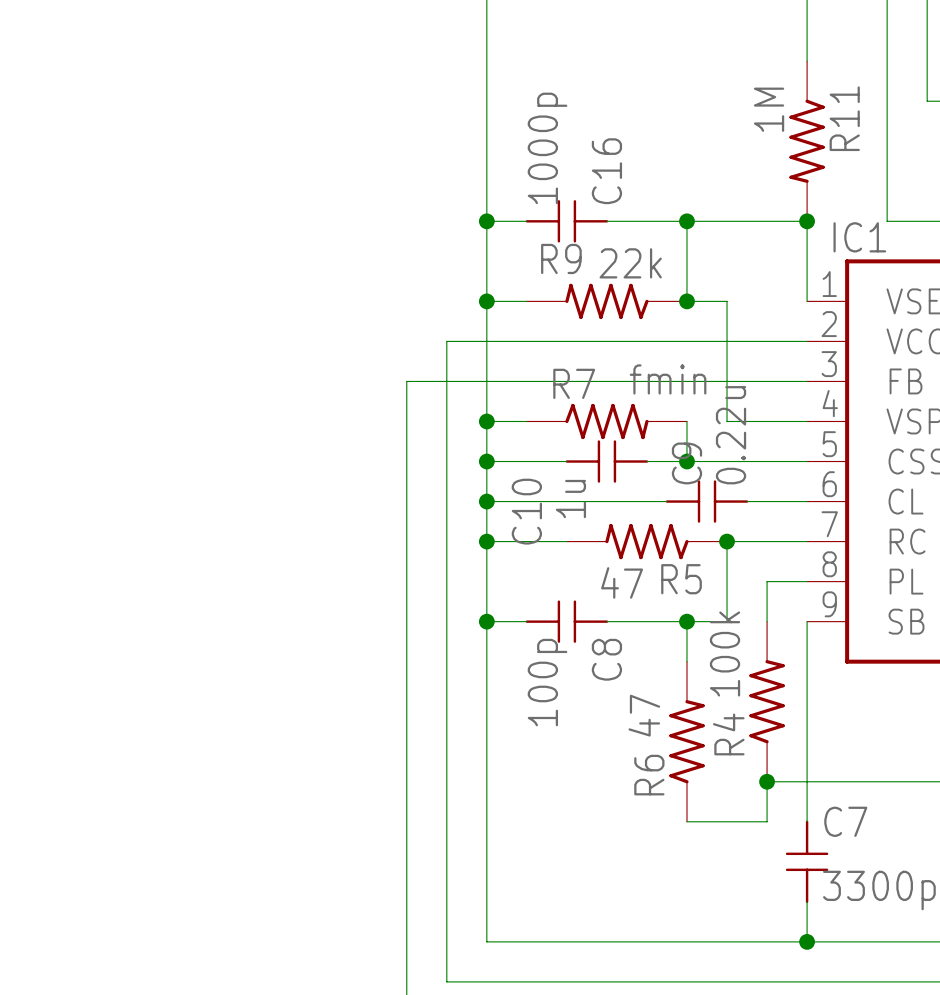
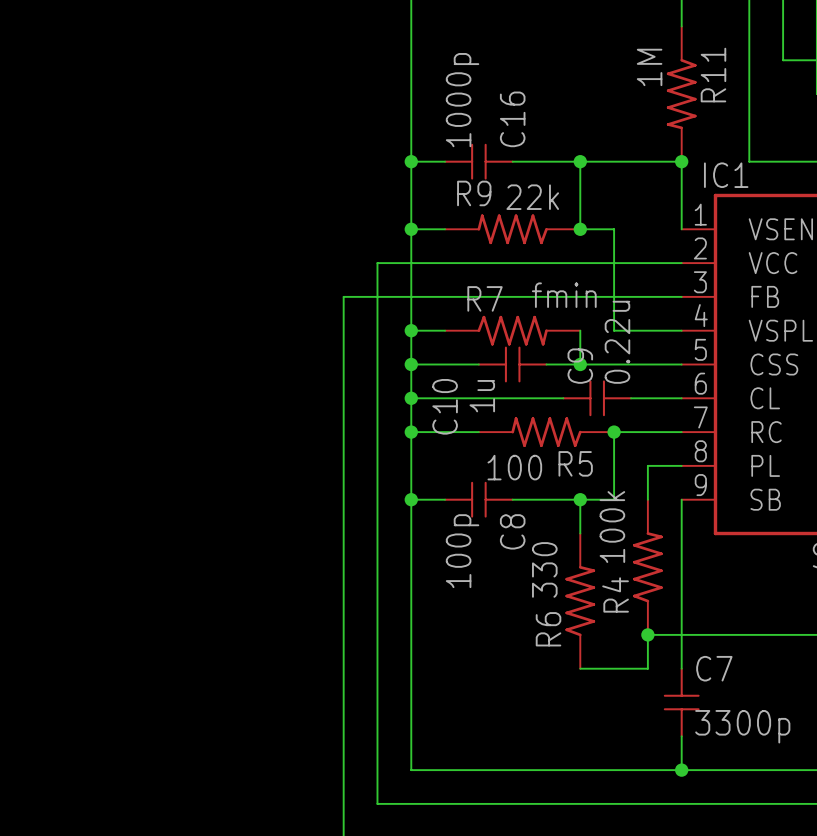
R5 value: 47 (622, 582) -> 100 (514, 467)
R6 value: 47 (644, 715) -> 330 (544, 569)

